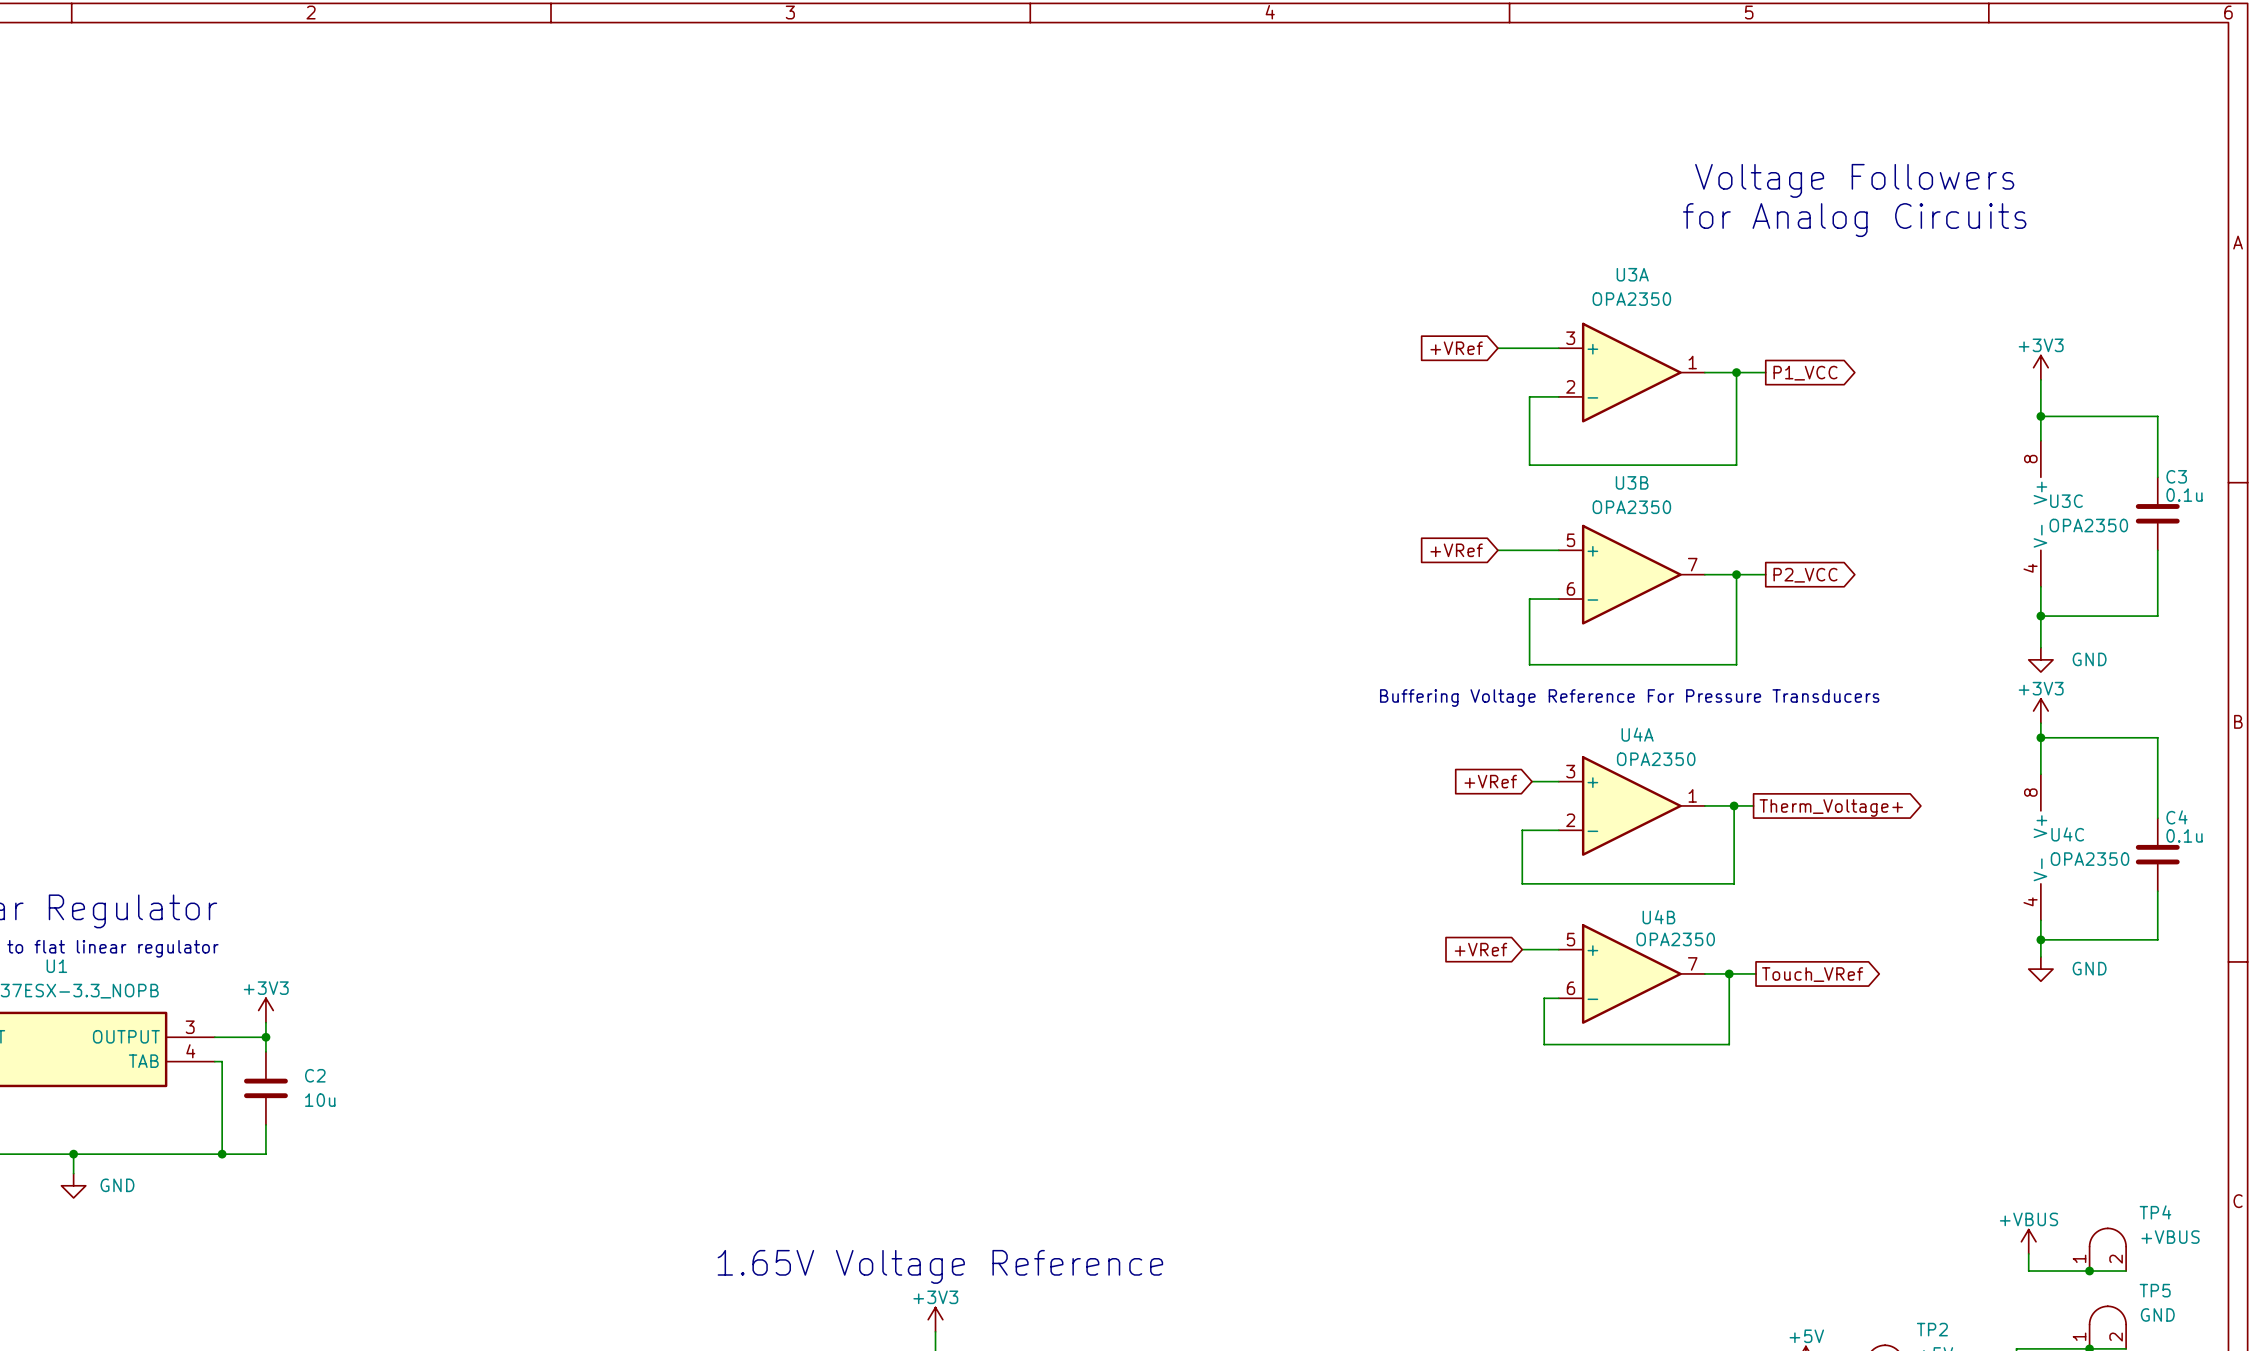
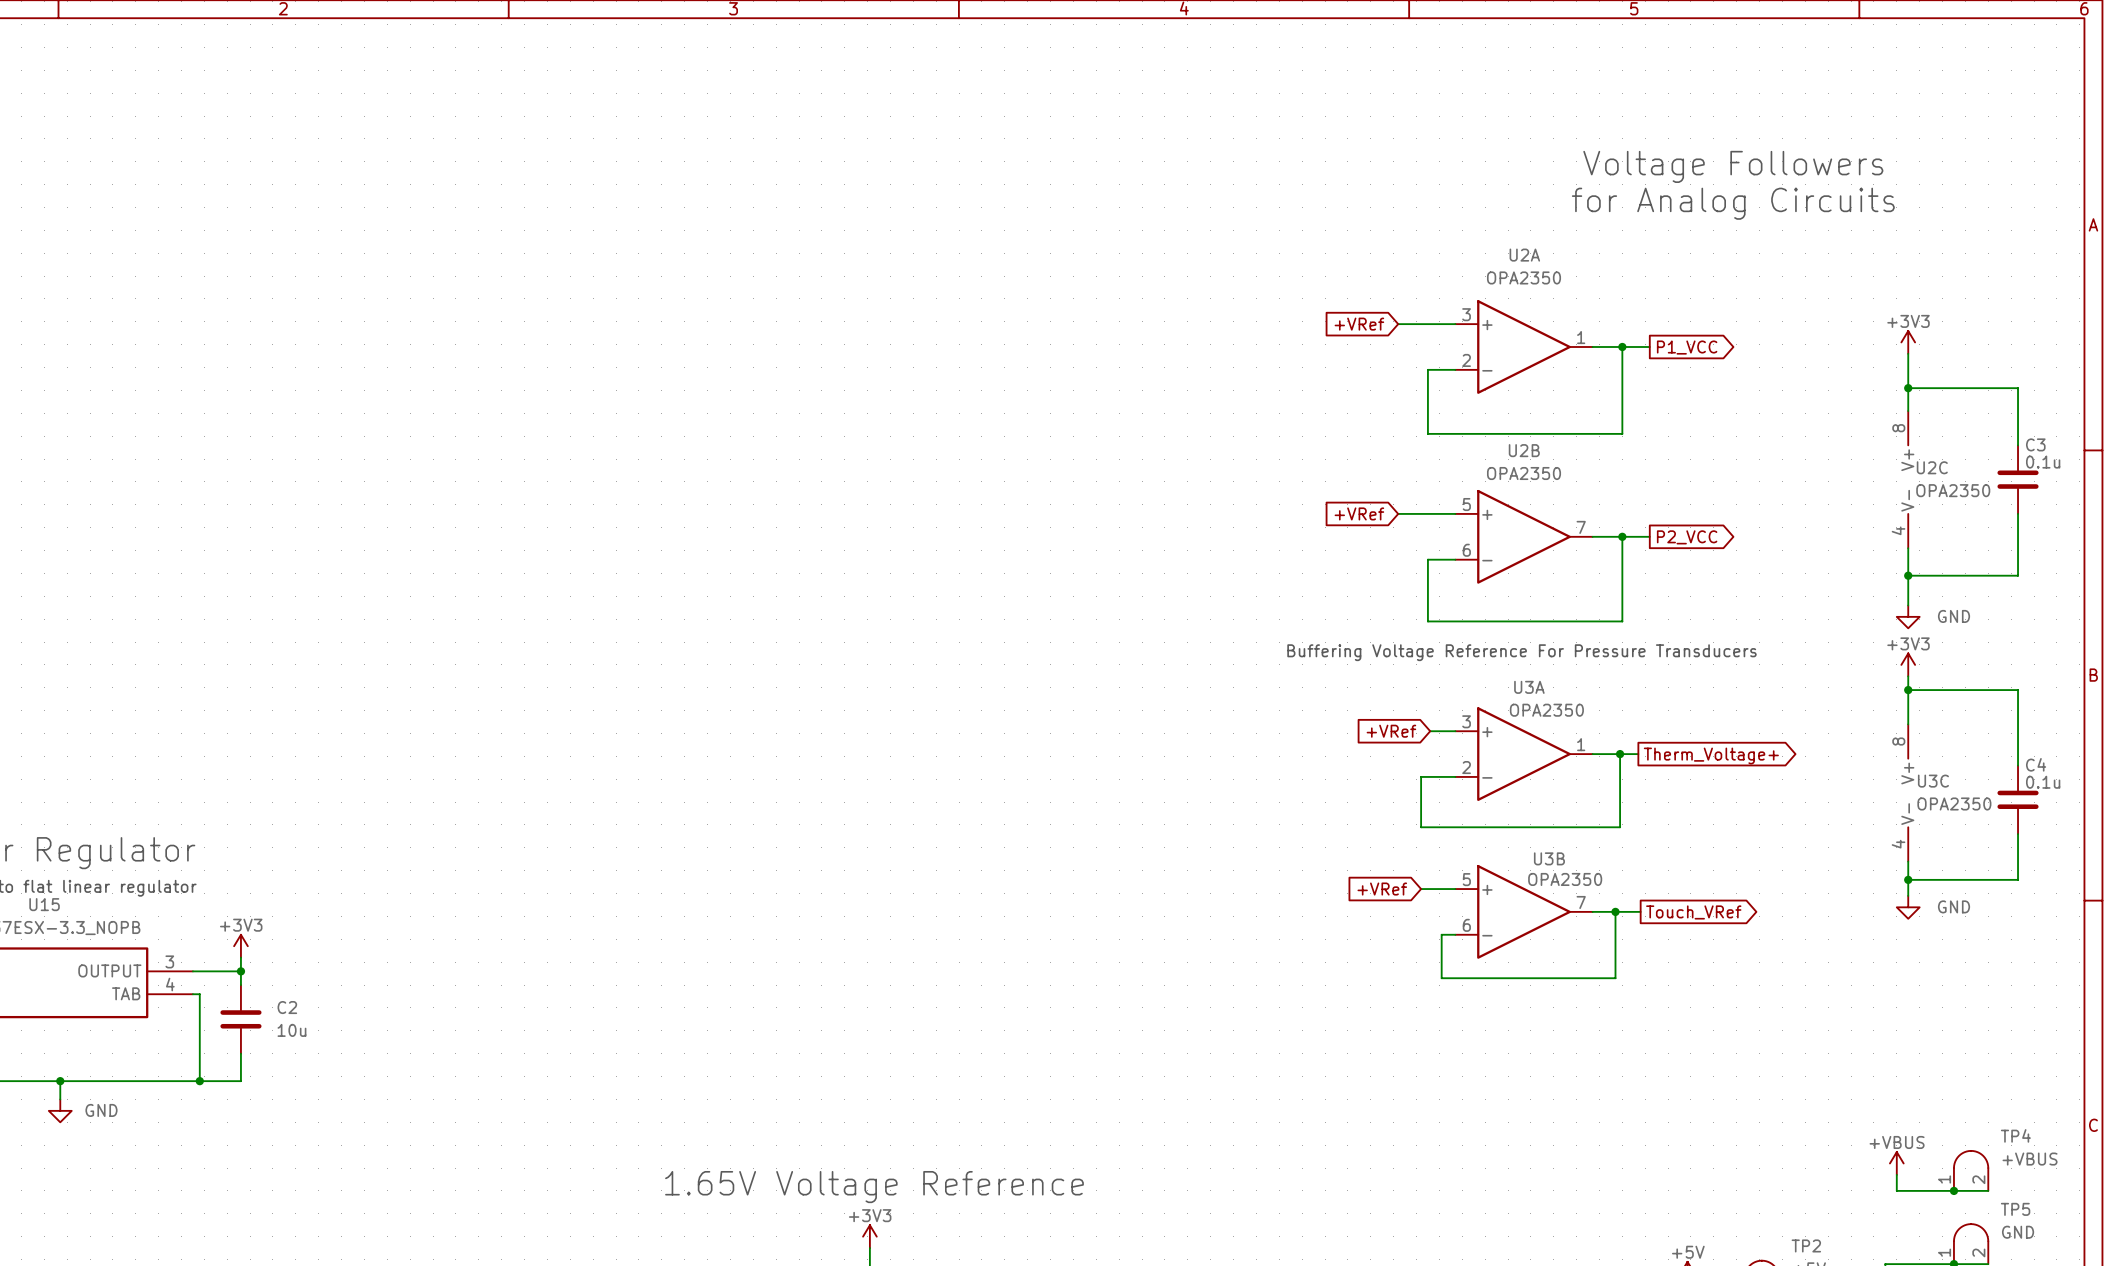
U3A name: U3A (1632, 274) -> U2A (1524, 255)
U3B name: U3B (1632, 482) -> U2B (1524, 450)
U3C name: U3C (2066, 501) -> U2C (1932, 467)
U4A name: U4A (1637, 734) -> U3A (1529, 687)
U4C name: U4C (2067, 834) -> U3C (1933, 781)
U4B name: U4B (1658, 917) -> U3B (1549, 858)
U1 name: U1 (56, 966) -> U15 (44, 904)

